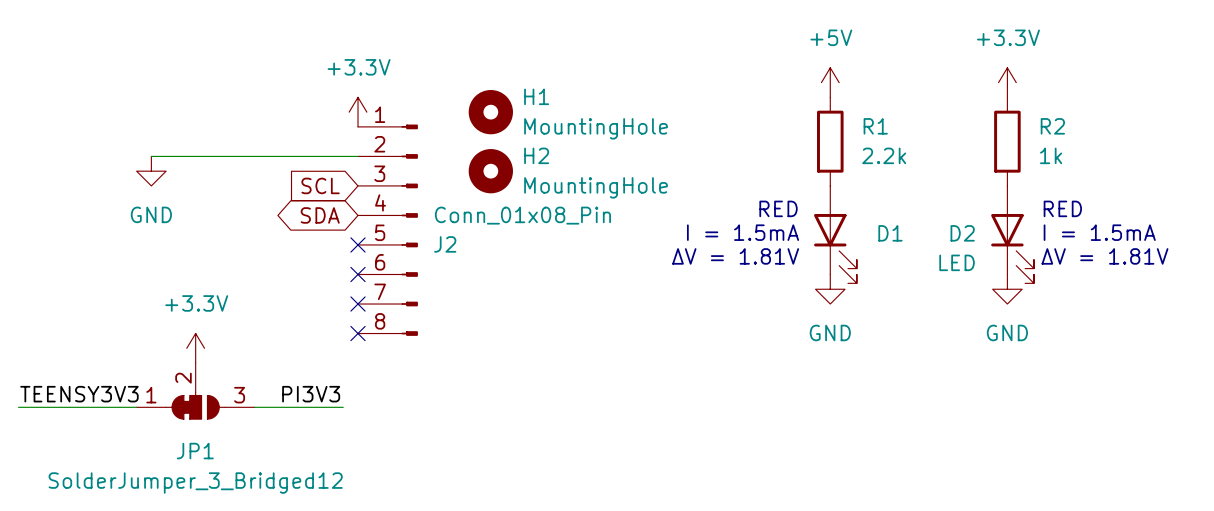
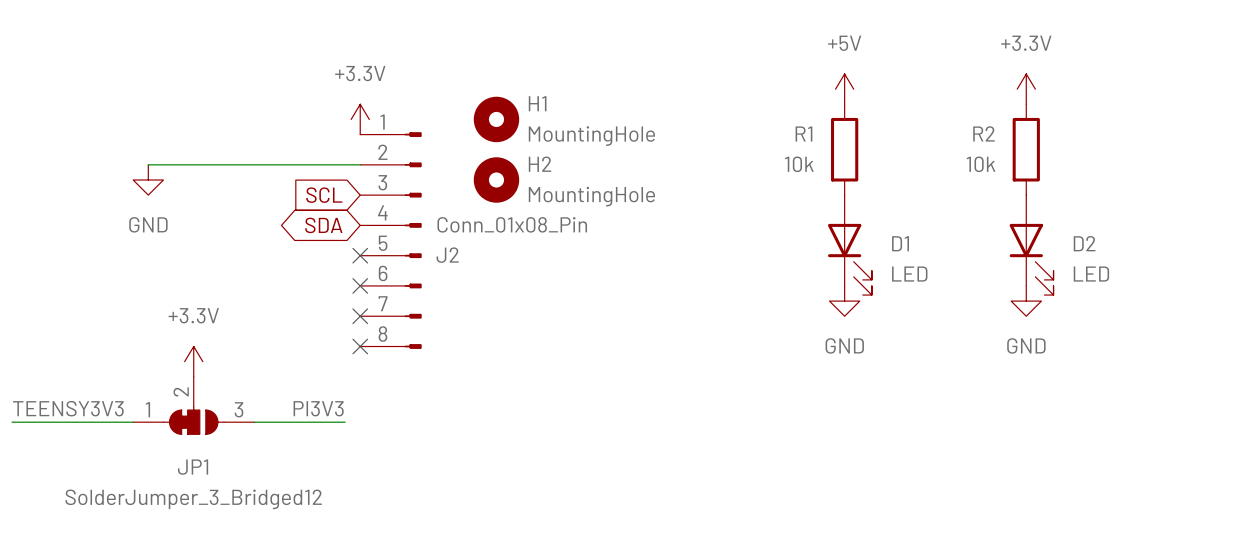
R1 name position: R1 (875, 126) -> R1 (803, 134)
R2 name position: R2 (1052, 126) -> R2 (983, 133)
R1 value: 2.2k (884, 155) -> 10k (799, 164)
R2 value: 1k (1051, 155) -> 10k (981, 164)
text: RED (778, 208) -> none
text: RED (1062, 208) -> none
text: I = 1.5mA (743, 232) -> none
text: I = 1.5mA (1099, 232) -> none
D2 name position: D2 (962, 233) -> D2 (1084, 243)
text: ΔV = 1.81V (735, 256) -> none
text: ΔV = 1.81V (1104, 256) -> none
D1 value: none -> LED (909, 274)
D2 value position: LED (957, 262) -> LED (1091, 274)

